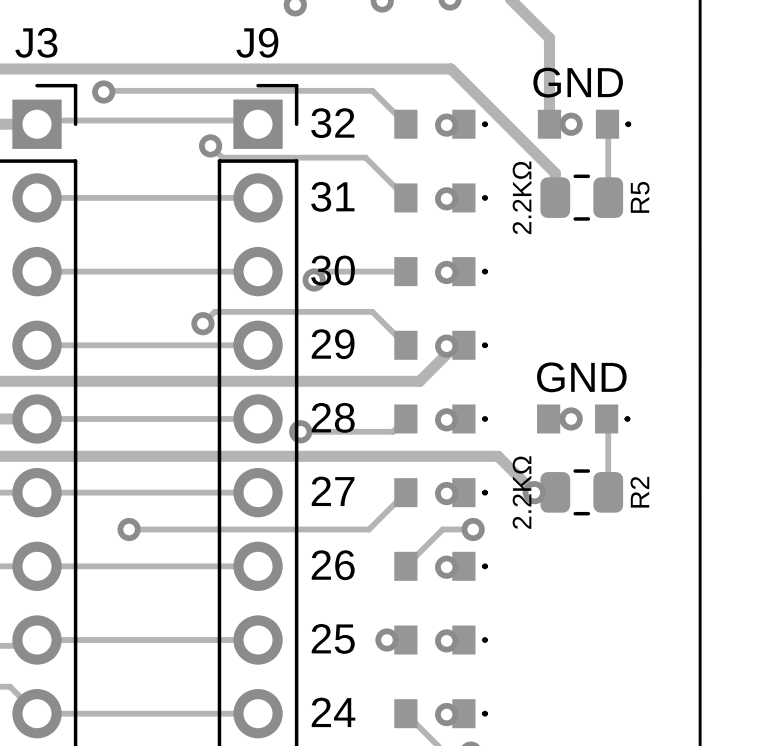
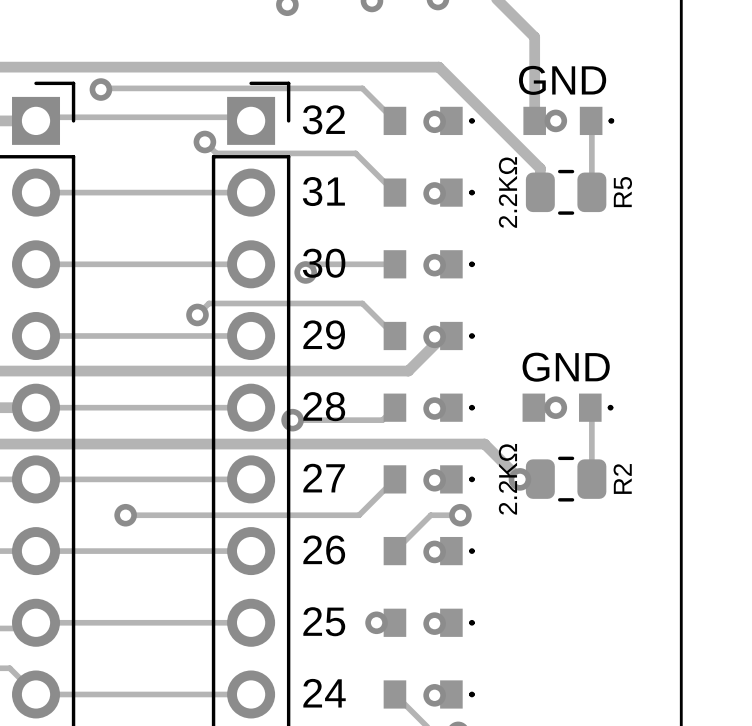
J3 name: J3 (36, 42) -> none
J9 name: J9 (257, 42) -> none

